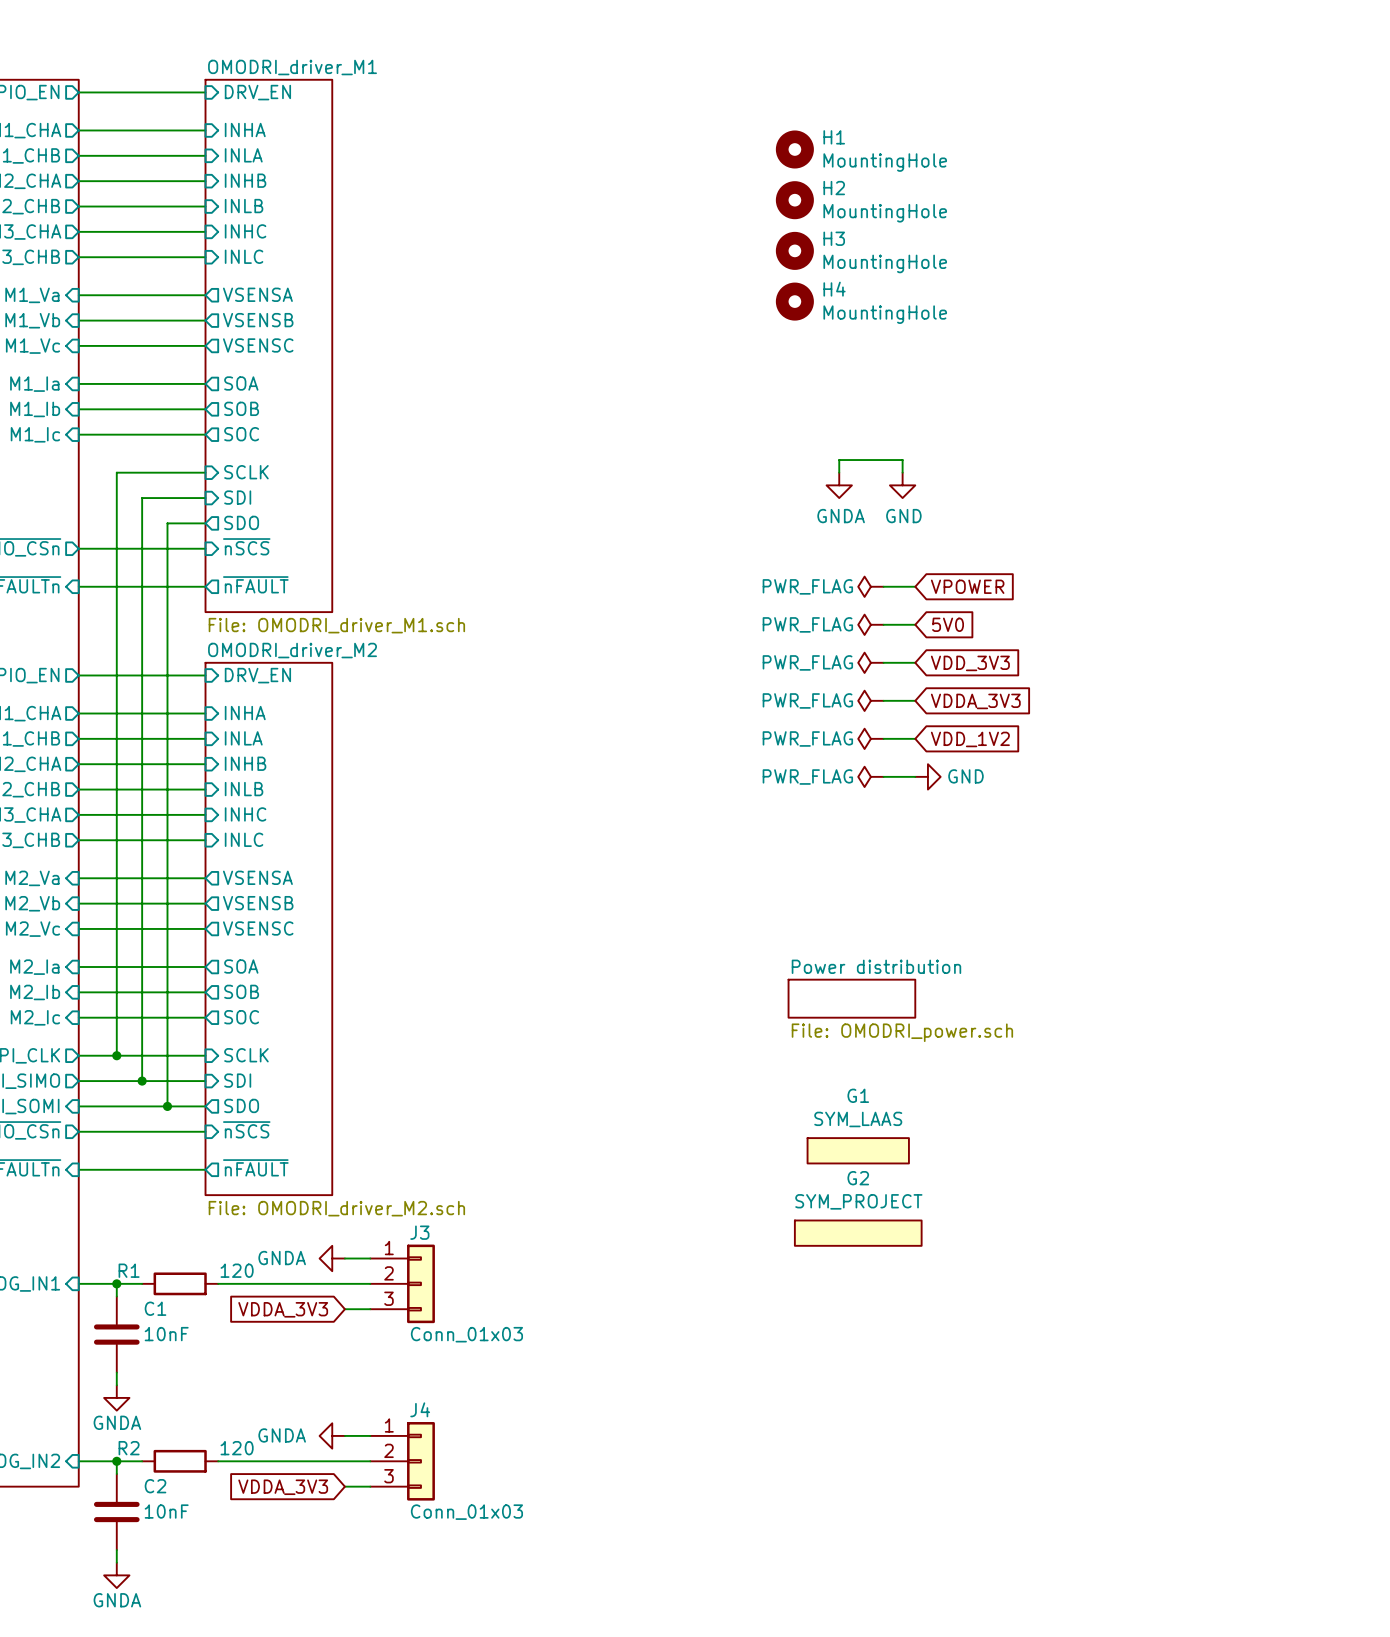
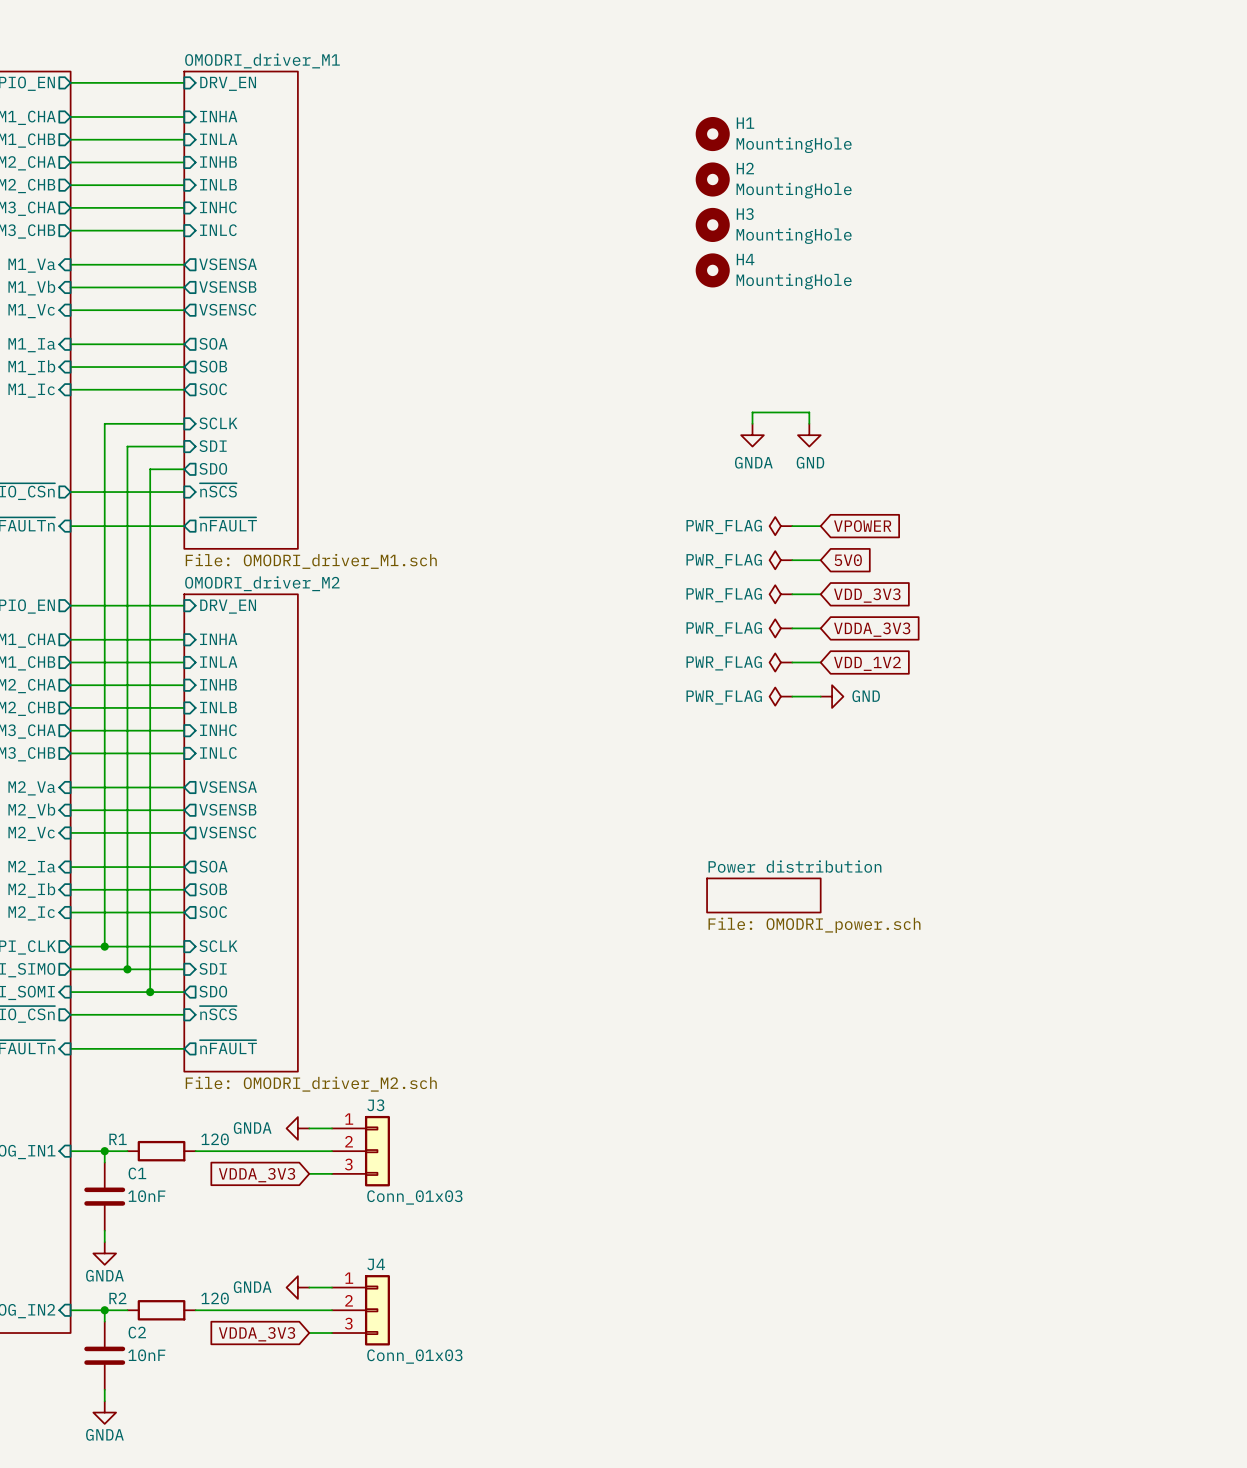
G1: SYM_LAAS (858, 1150) -> none
G2: SYM_PROJECT (858, 1233) -> none

